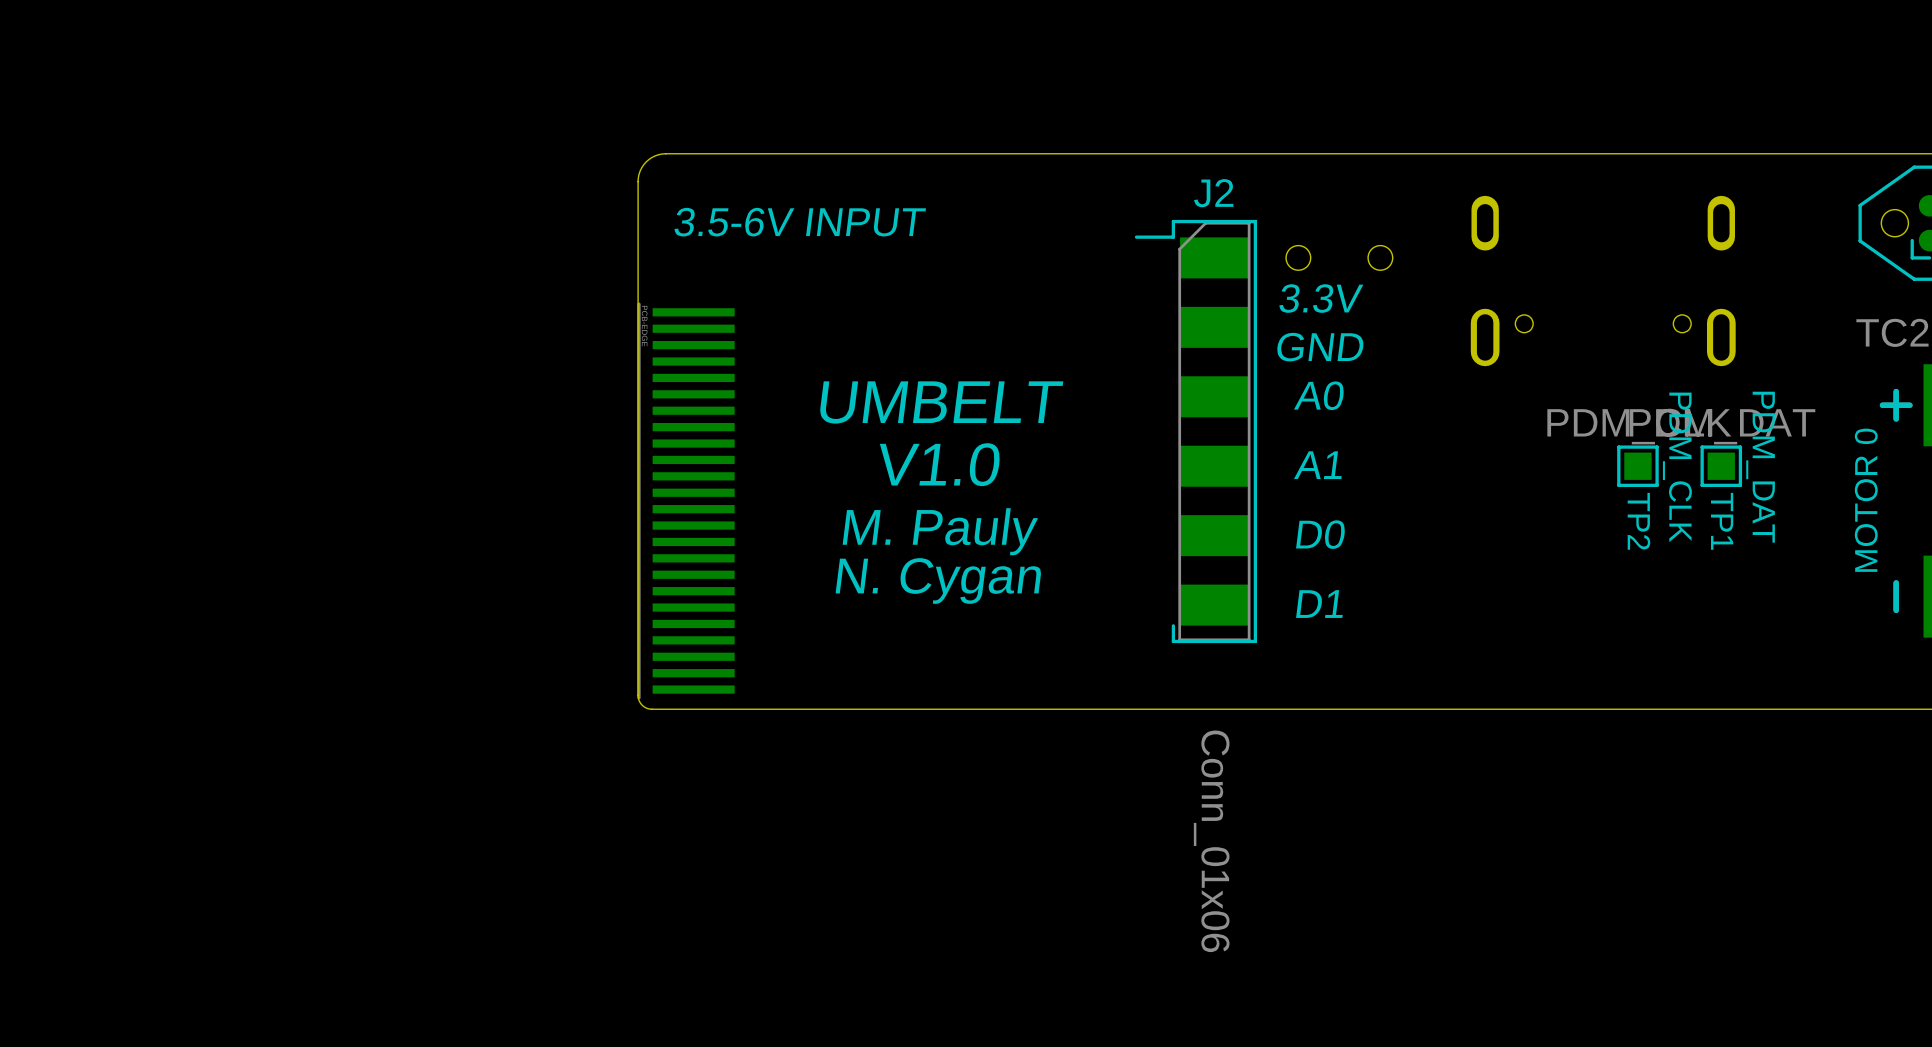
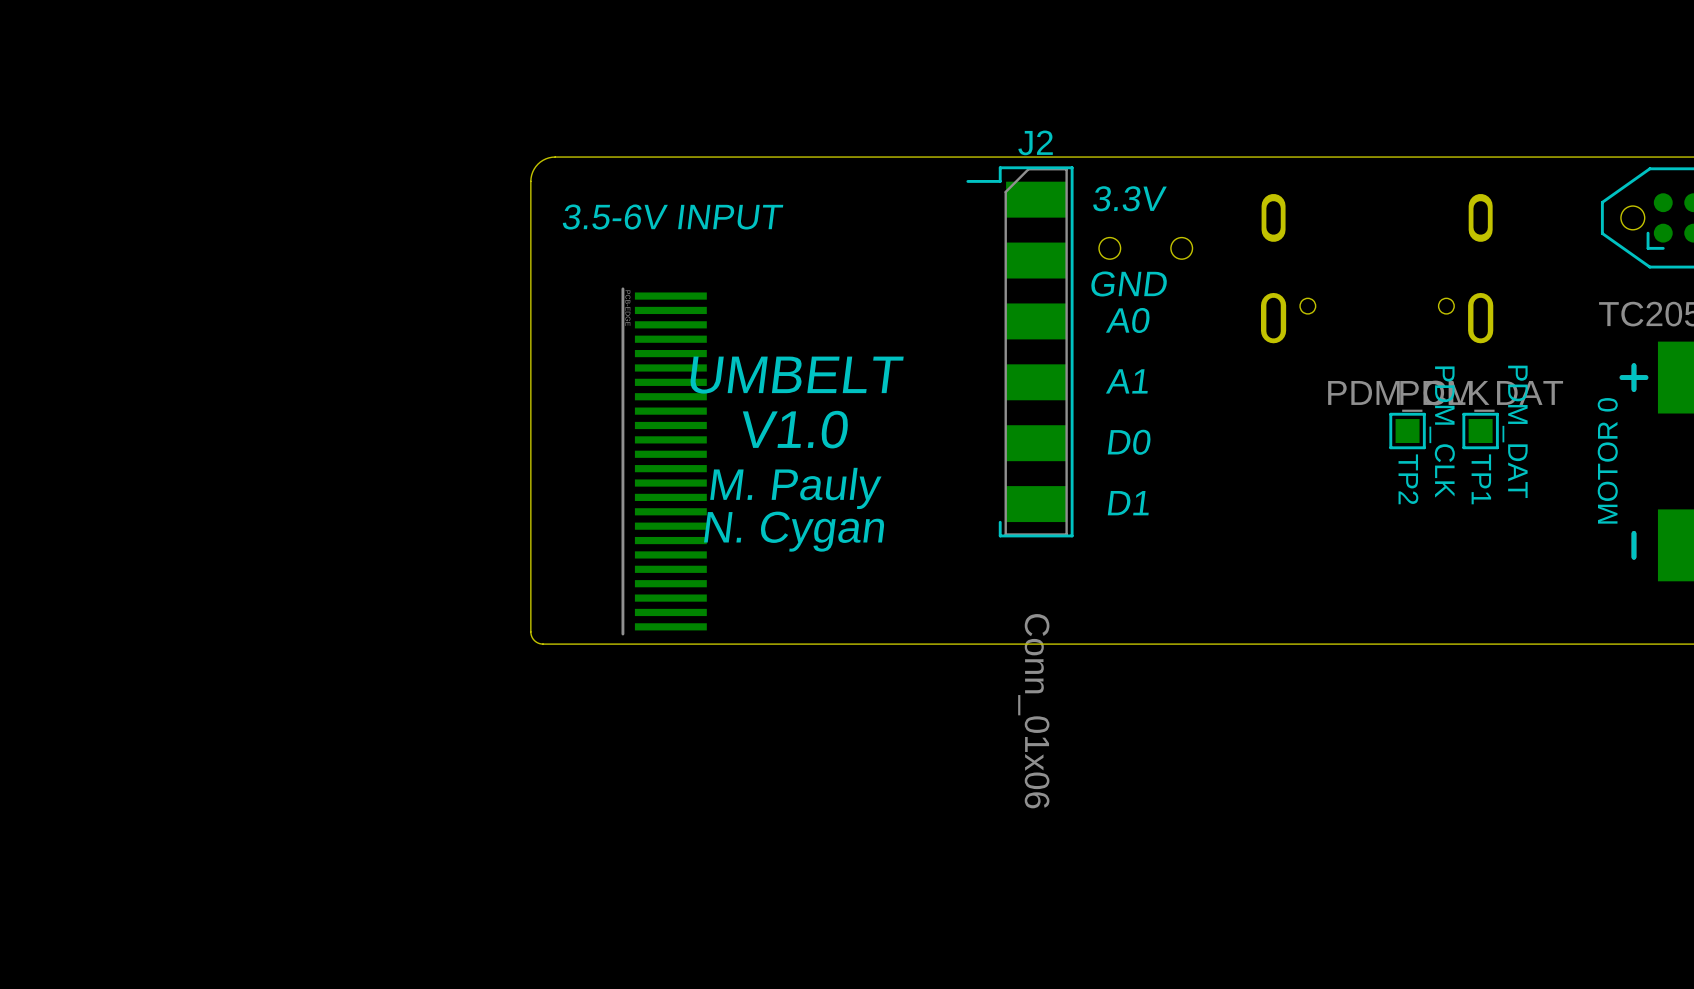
text: none -> 3.3V (1130, 198)
text: 3.3V (1321, 298) -> GND (1129, 283)
text: GND (1320, 347) -> A0 (1127, 320)
text: A0 (1319, 395) -> A1 (1126, 381)
J2 position: (1195, 431) -> (1019, 351)
text: A1 (1317, 465) -> D0 (1129, 442)
part position: (685, 500) -> (664, 461)
text: D0 (1320, 534) -> D1 (1128, 503)
text: D1 (1319, 604) -> none

